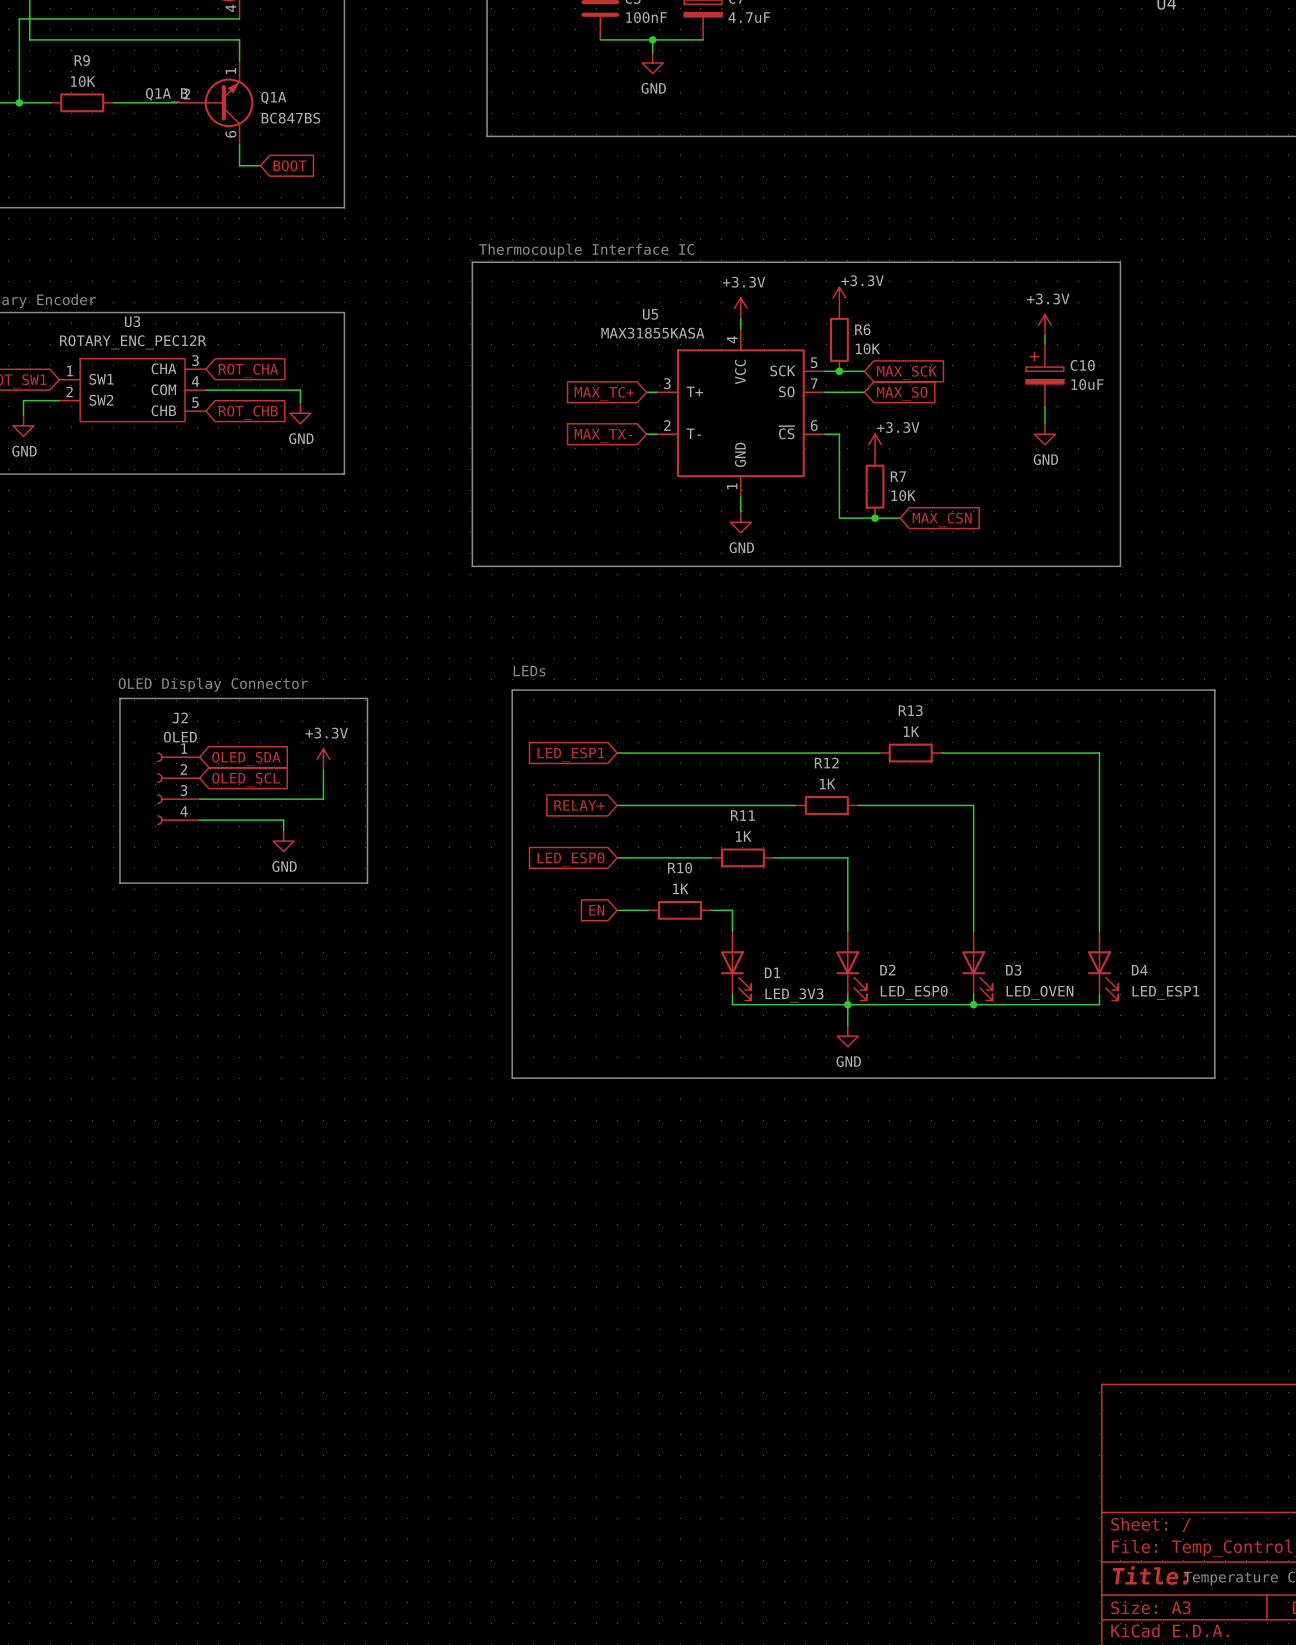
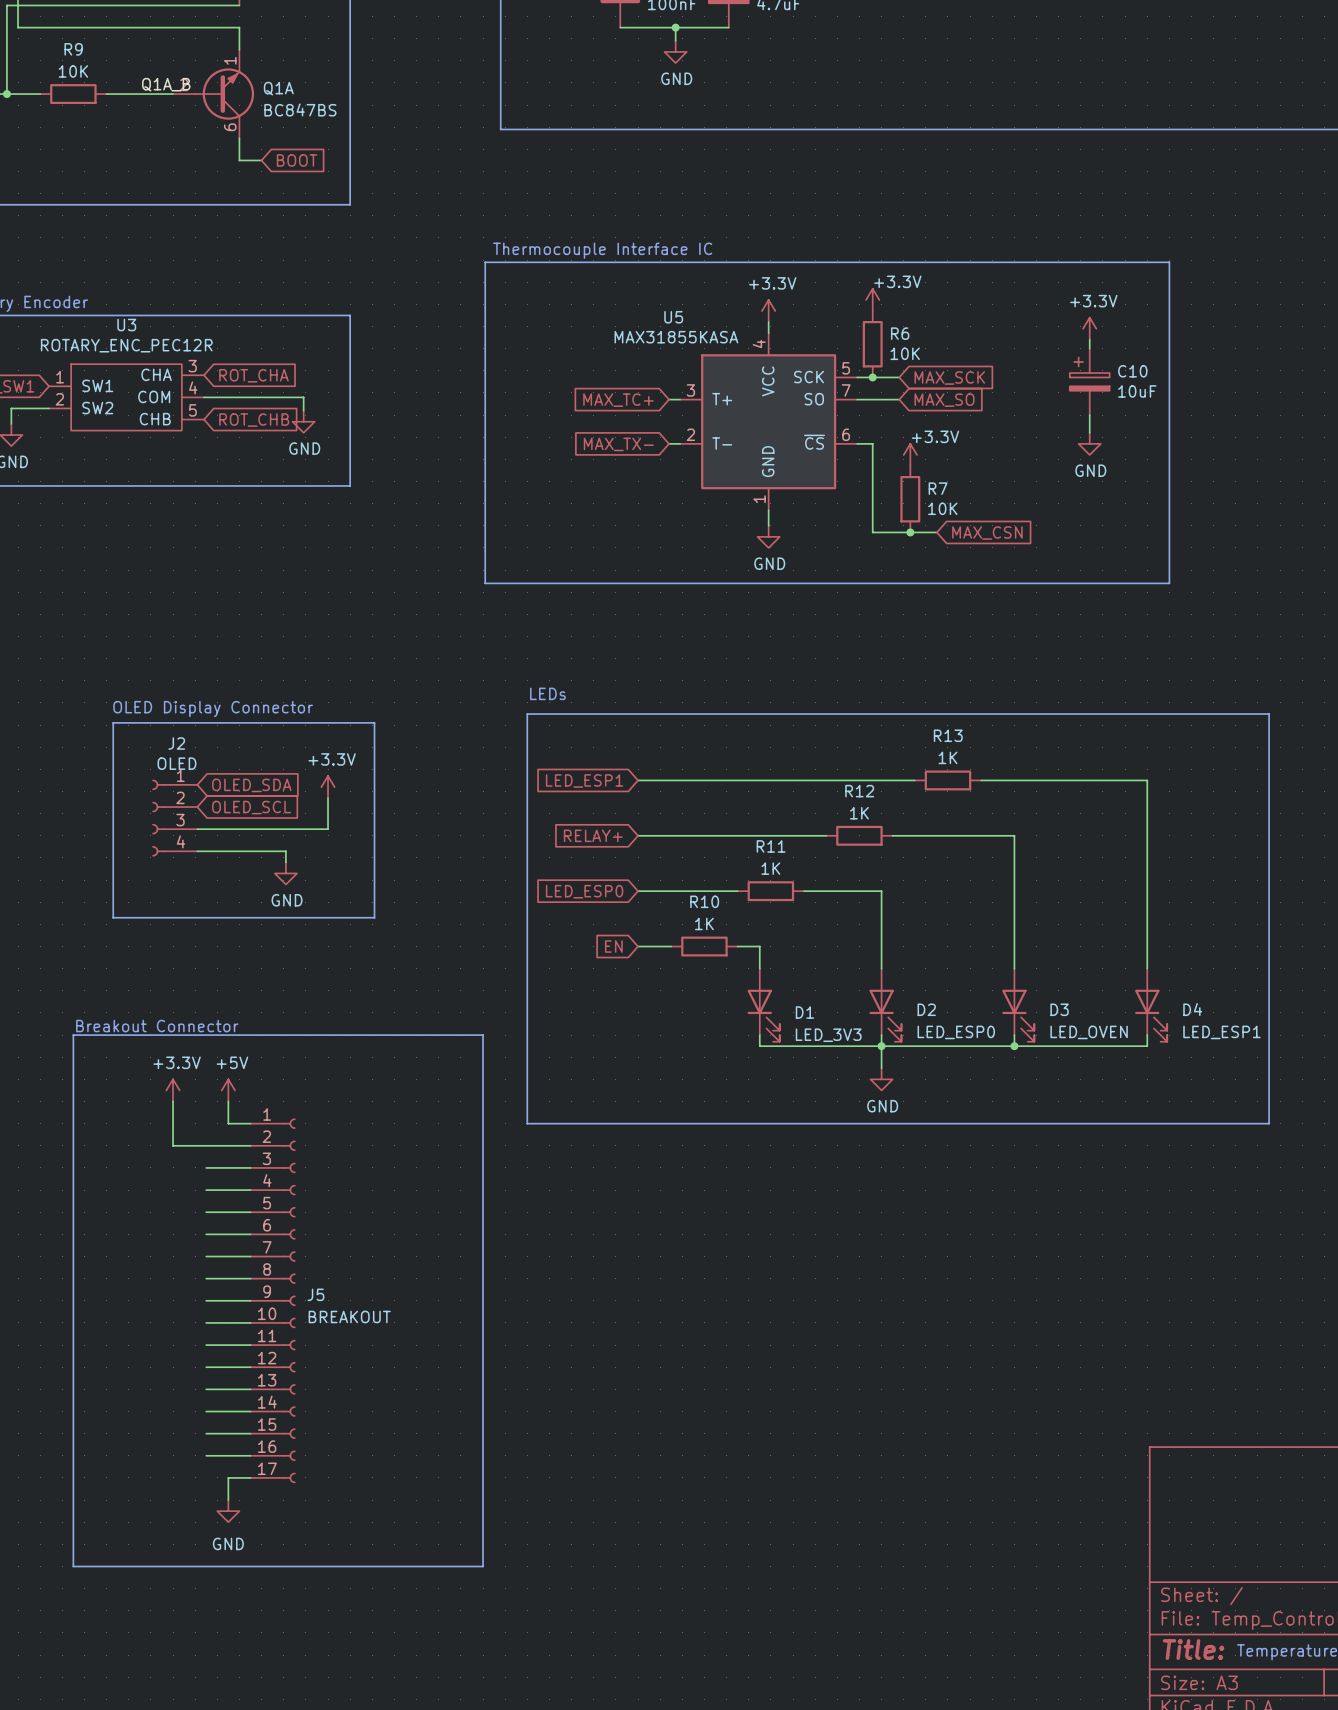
text: none -> Breakout Connector (157, 1026)
line: none -> (73, 1035) (483, 1035) (483, 1566) (73, 1566) (73, 1035)
power symbol: none -> +3.3V (173, 1090)
power symbol: none -> +5V (228, 1090)
wire: none -> (173, 1101) (173, 1145) (250, 1145)
wire: none -> (228, 1101) (228, 1123) (250, 1123)
wire: none -> (206, 1167) (250, 1167)
wire: none -> (206, 1190) (250, 1190)
wire: none -> (206, 1212) (250, 1212)
wire: none -> (206, 1234) (250, 1234)
wire: none -> (206, 1256) (250, 1256)
wire: none -> (206, 1278) (250, 1278)
wire: none -> (206, 1300) (250, 1300)
J5: none -> BREAKOUT (272, 1300)
wire: none -> (206, 1322) (250, 1322)
wire: none -> (206, 1345) (250, 1345)
wire: none -> (206, 1367) (250, 1367)
wire: none -> (206, 1389) (250, 1389)
wire: none -> (206, 1411) (250, 1411)
wire: none -> (206, 1433) (250, 1433)
wire: none -> (206, 1455) (250, 1455)
wire: none -> (250, 1477) (228, 1477) (228, 1500)
power symbol: none -> GND (228, 1511)

